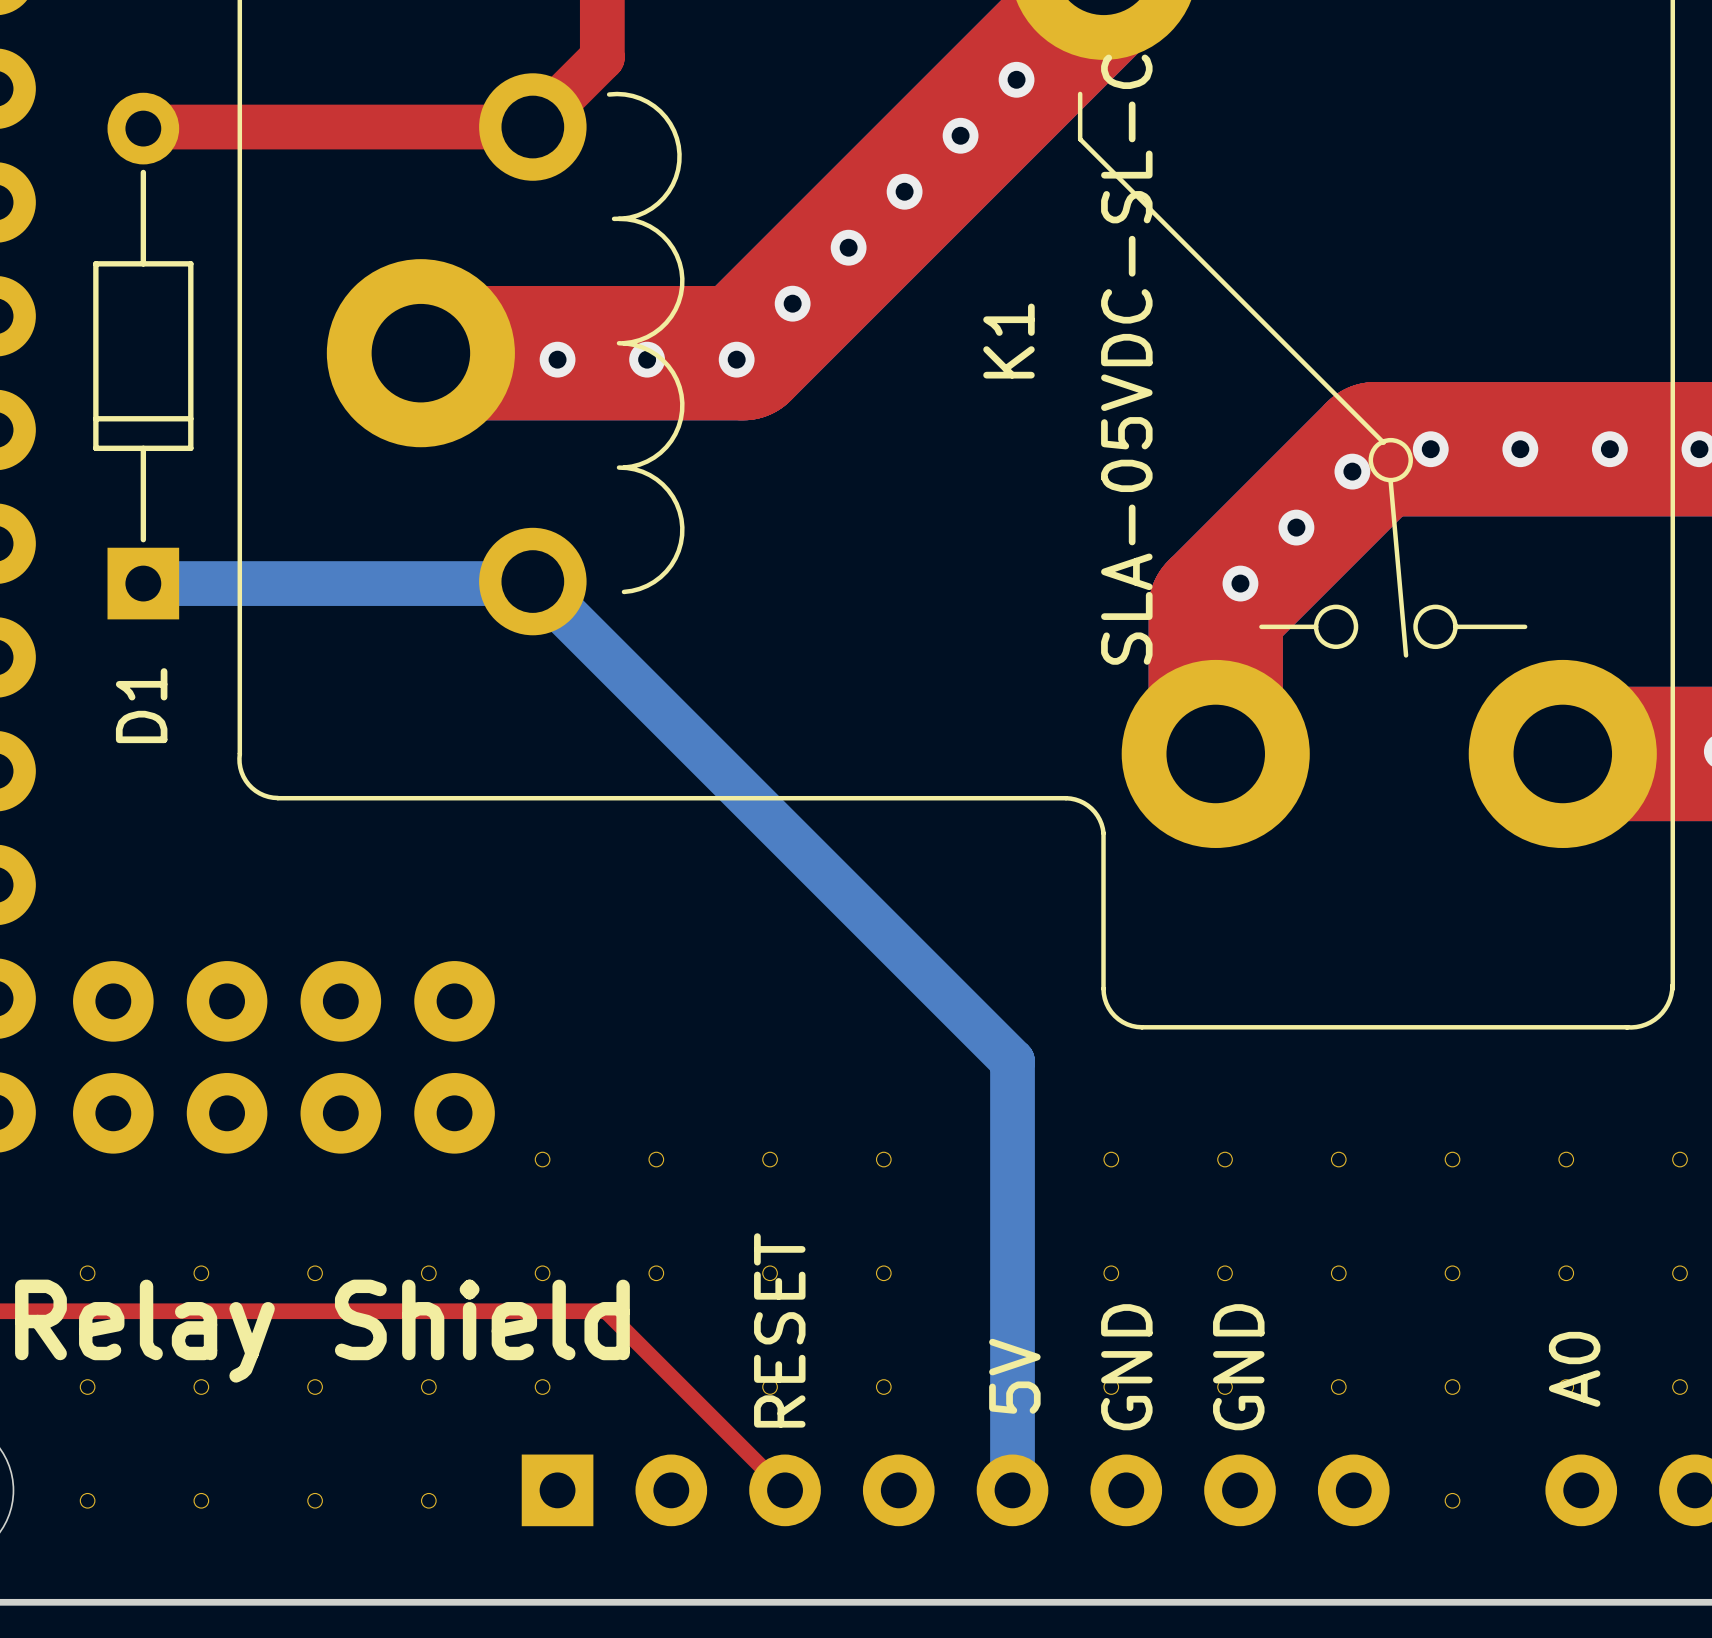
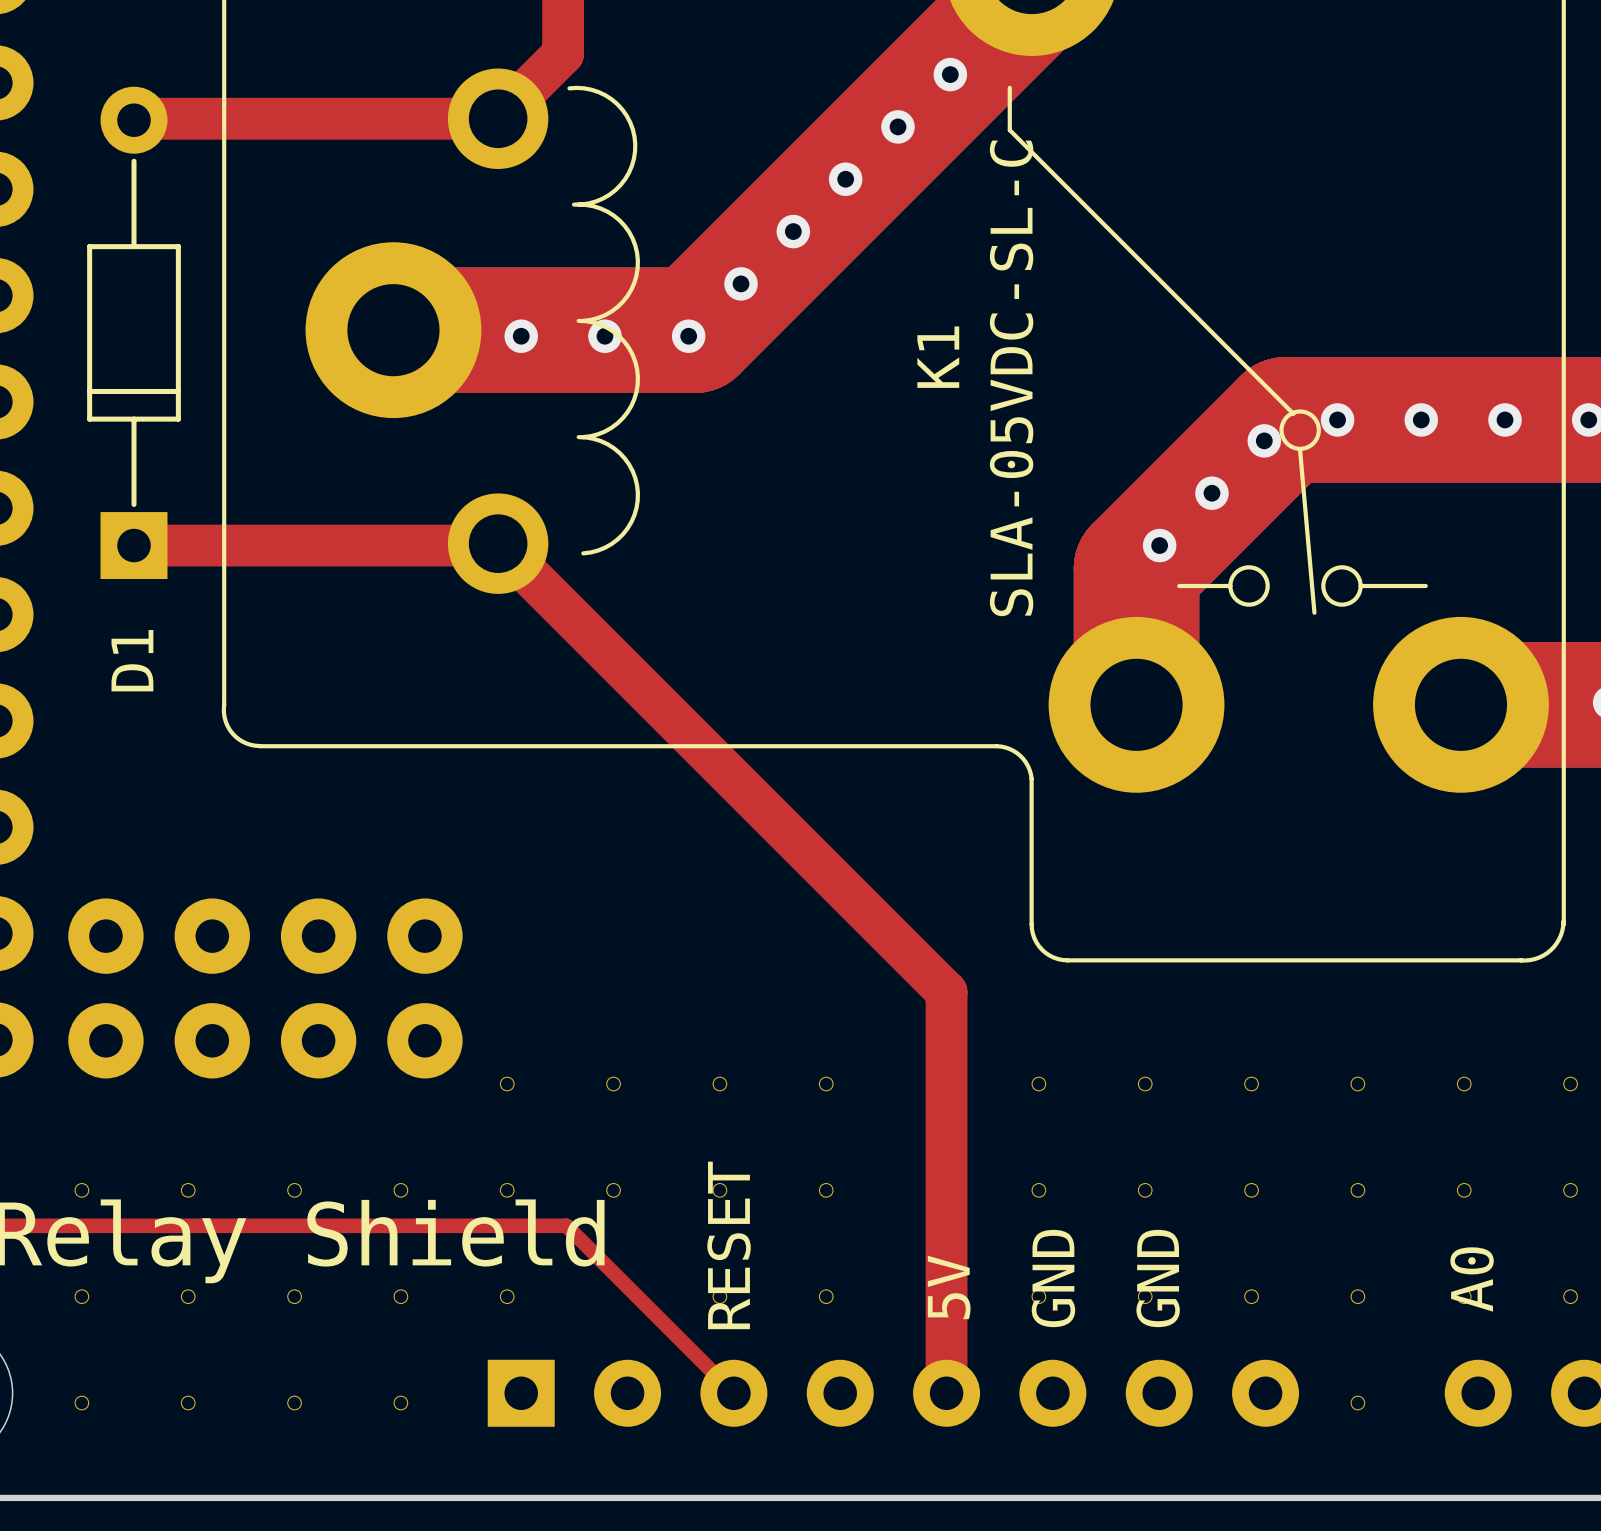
K1 name position: K1 (1008, 341) -> K1 (938, 357)
K1 value position: SLA-05VDC-SL-C (1126, 359) -> SLA-05VDC-SL-C (1011, 378)
bottom track: (143, 583) (530, 583) (532, 581) (1012, 1061) (1012, 1490) -> none
top track: none -> (134, 545) (496, 545) (498, 543) (946, 992) (946, 1393)

